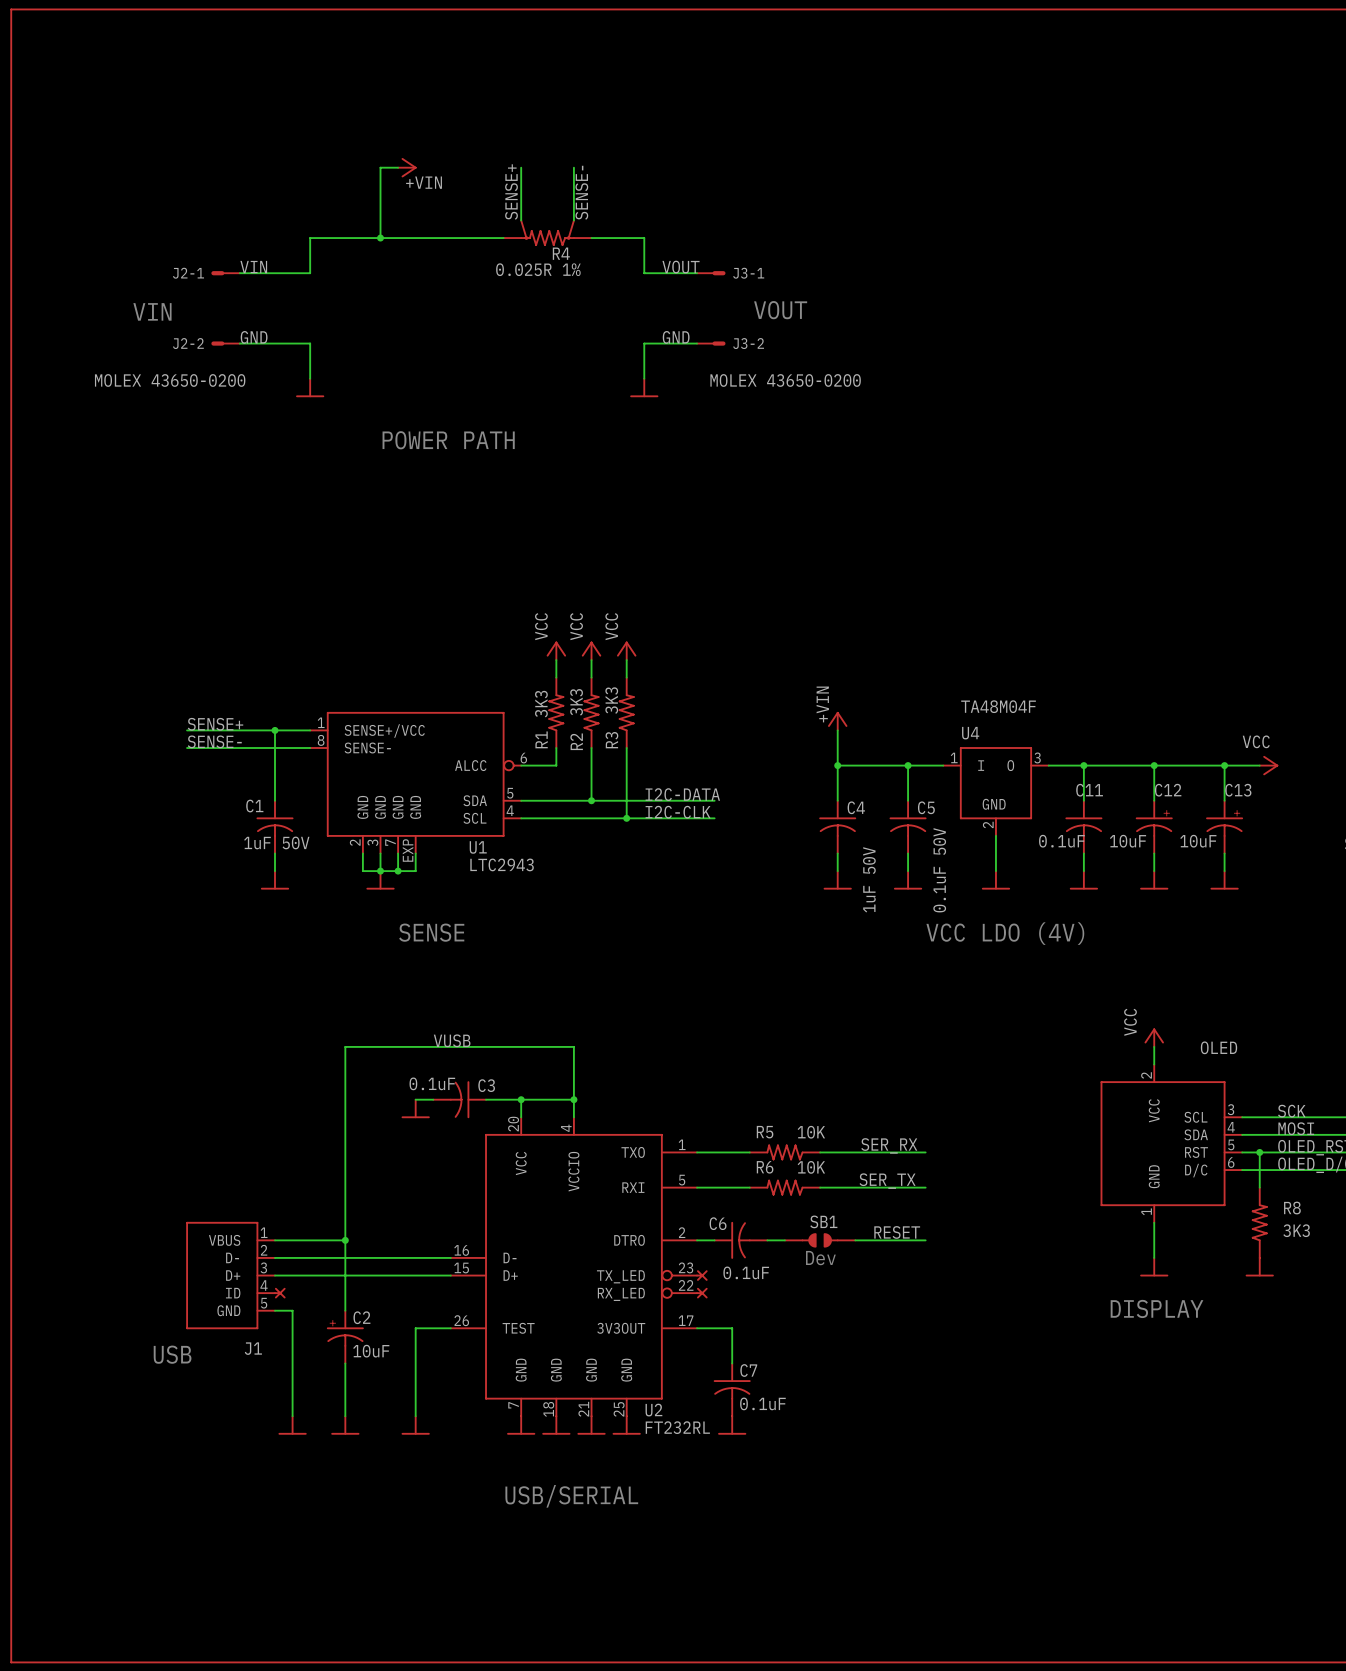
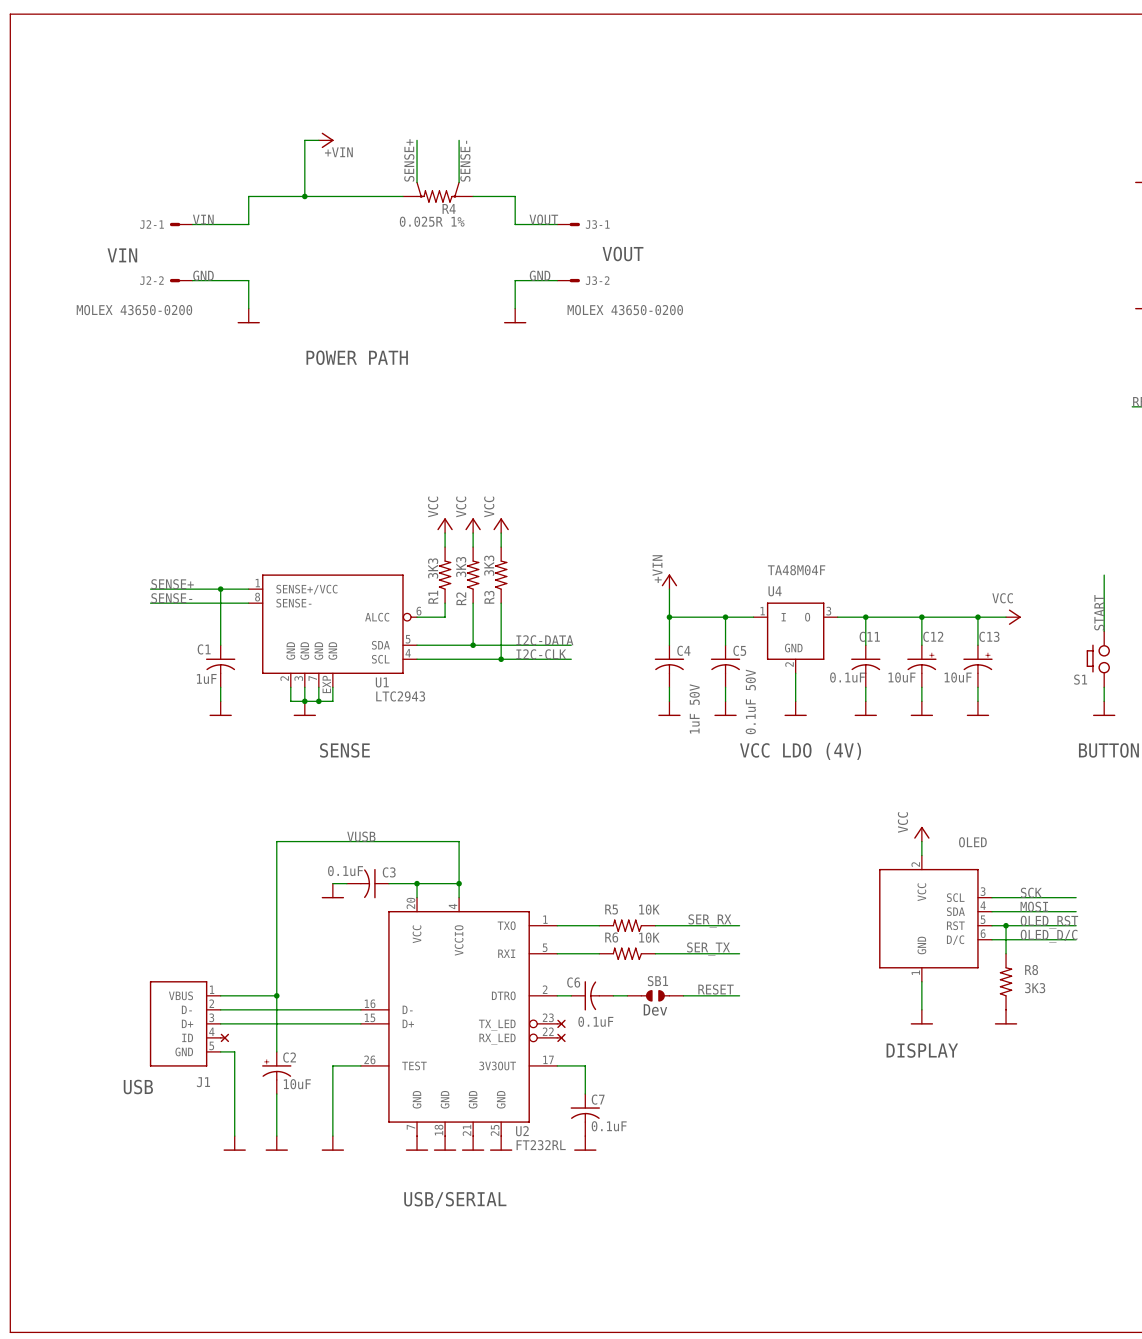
C1 value: 1uF 50V (276, 842) -> 1uF (206, 678)

